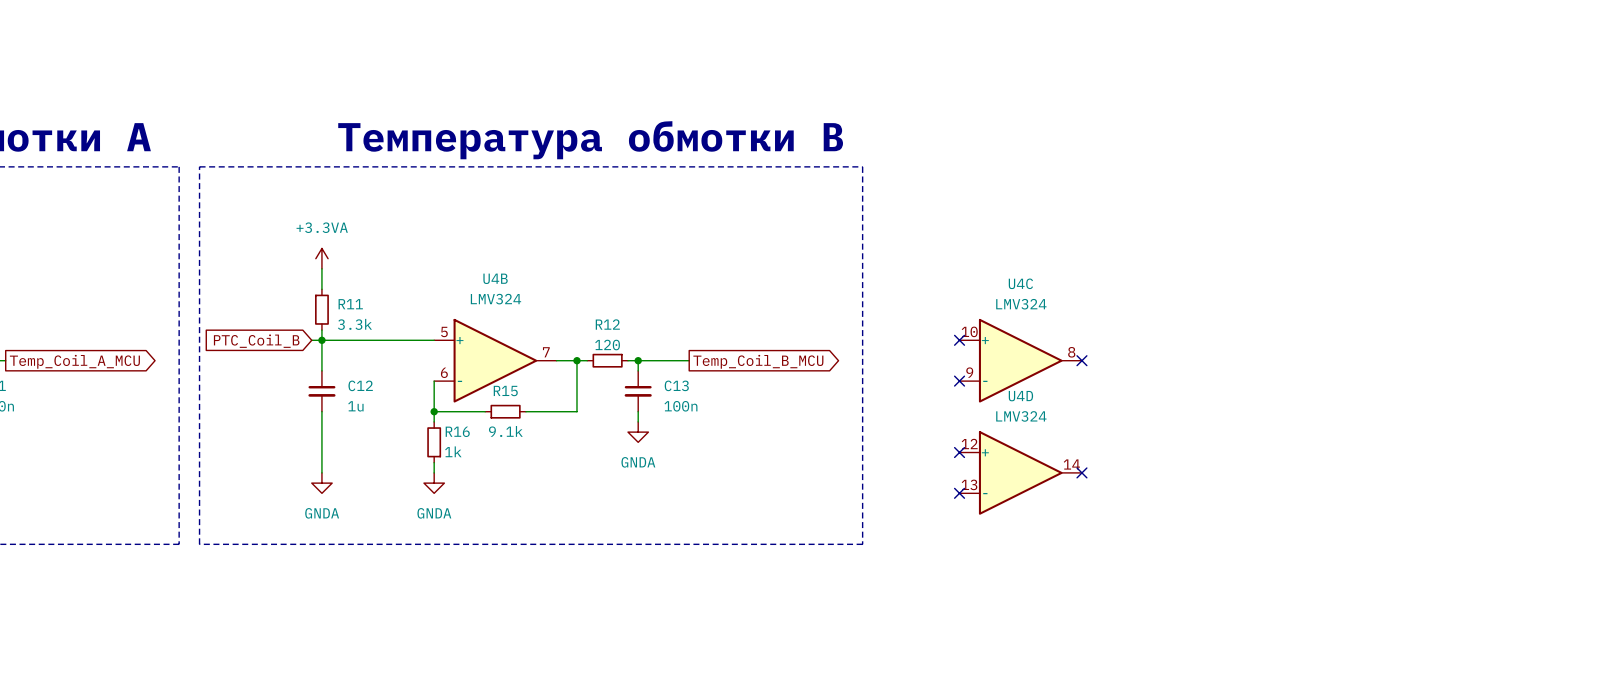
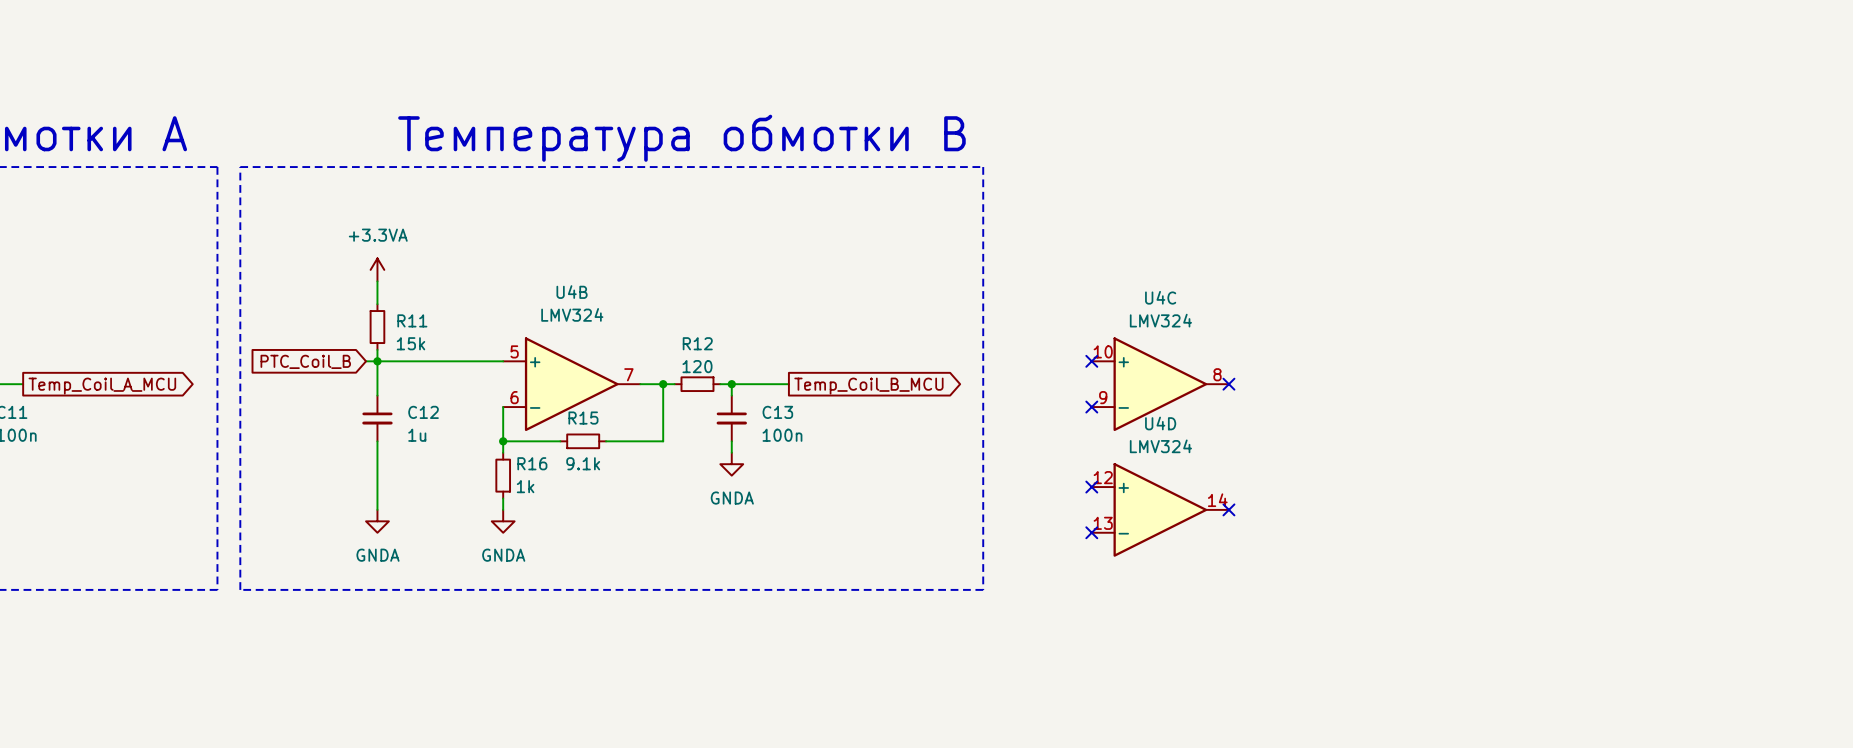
R11 value: 3.3k (354, 324) -> 15k (411, 343)

